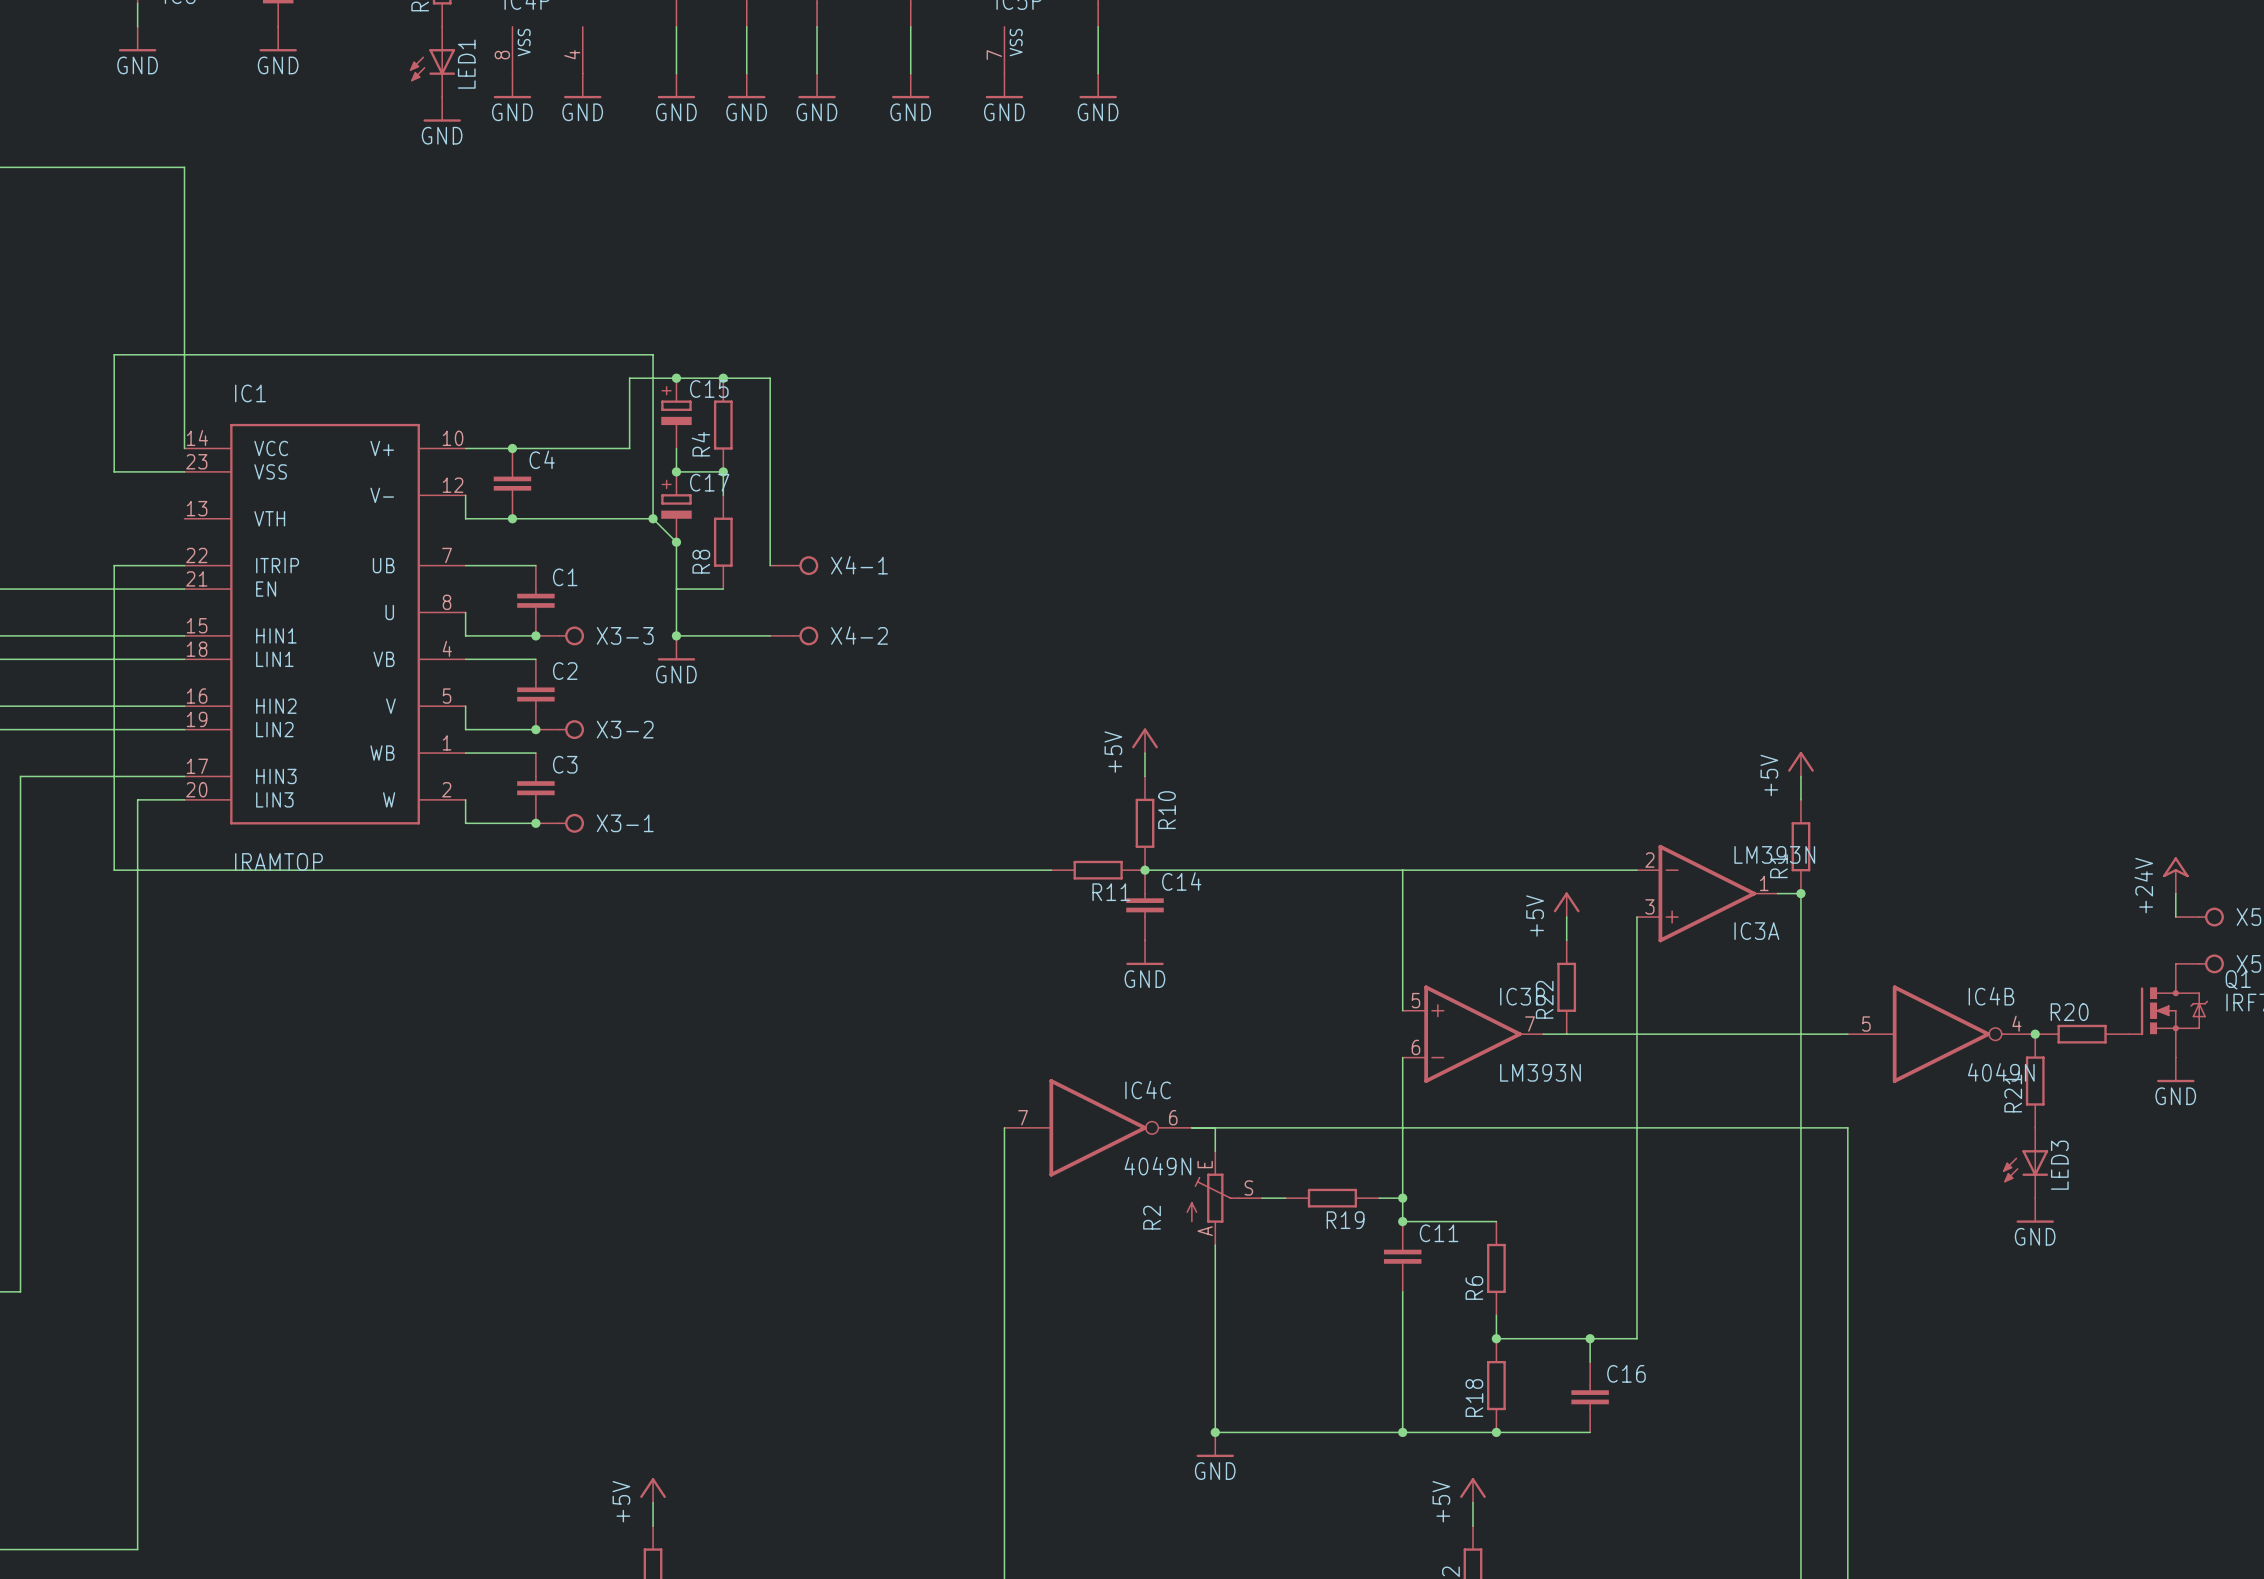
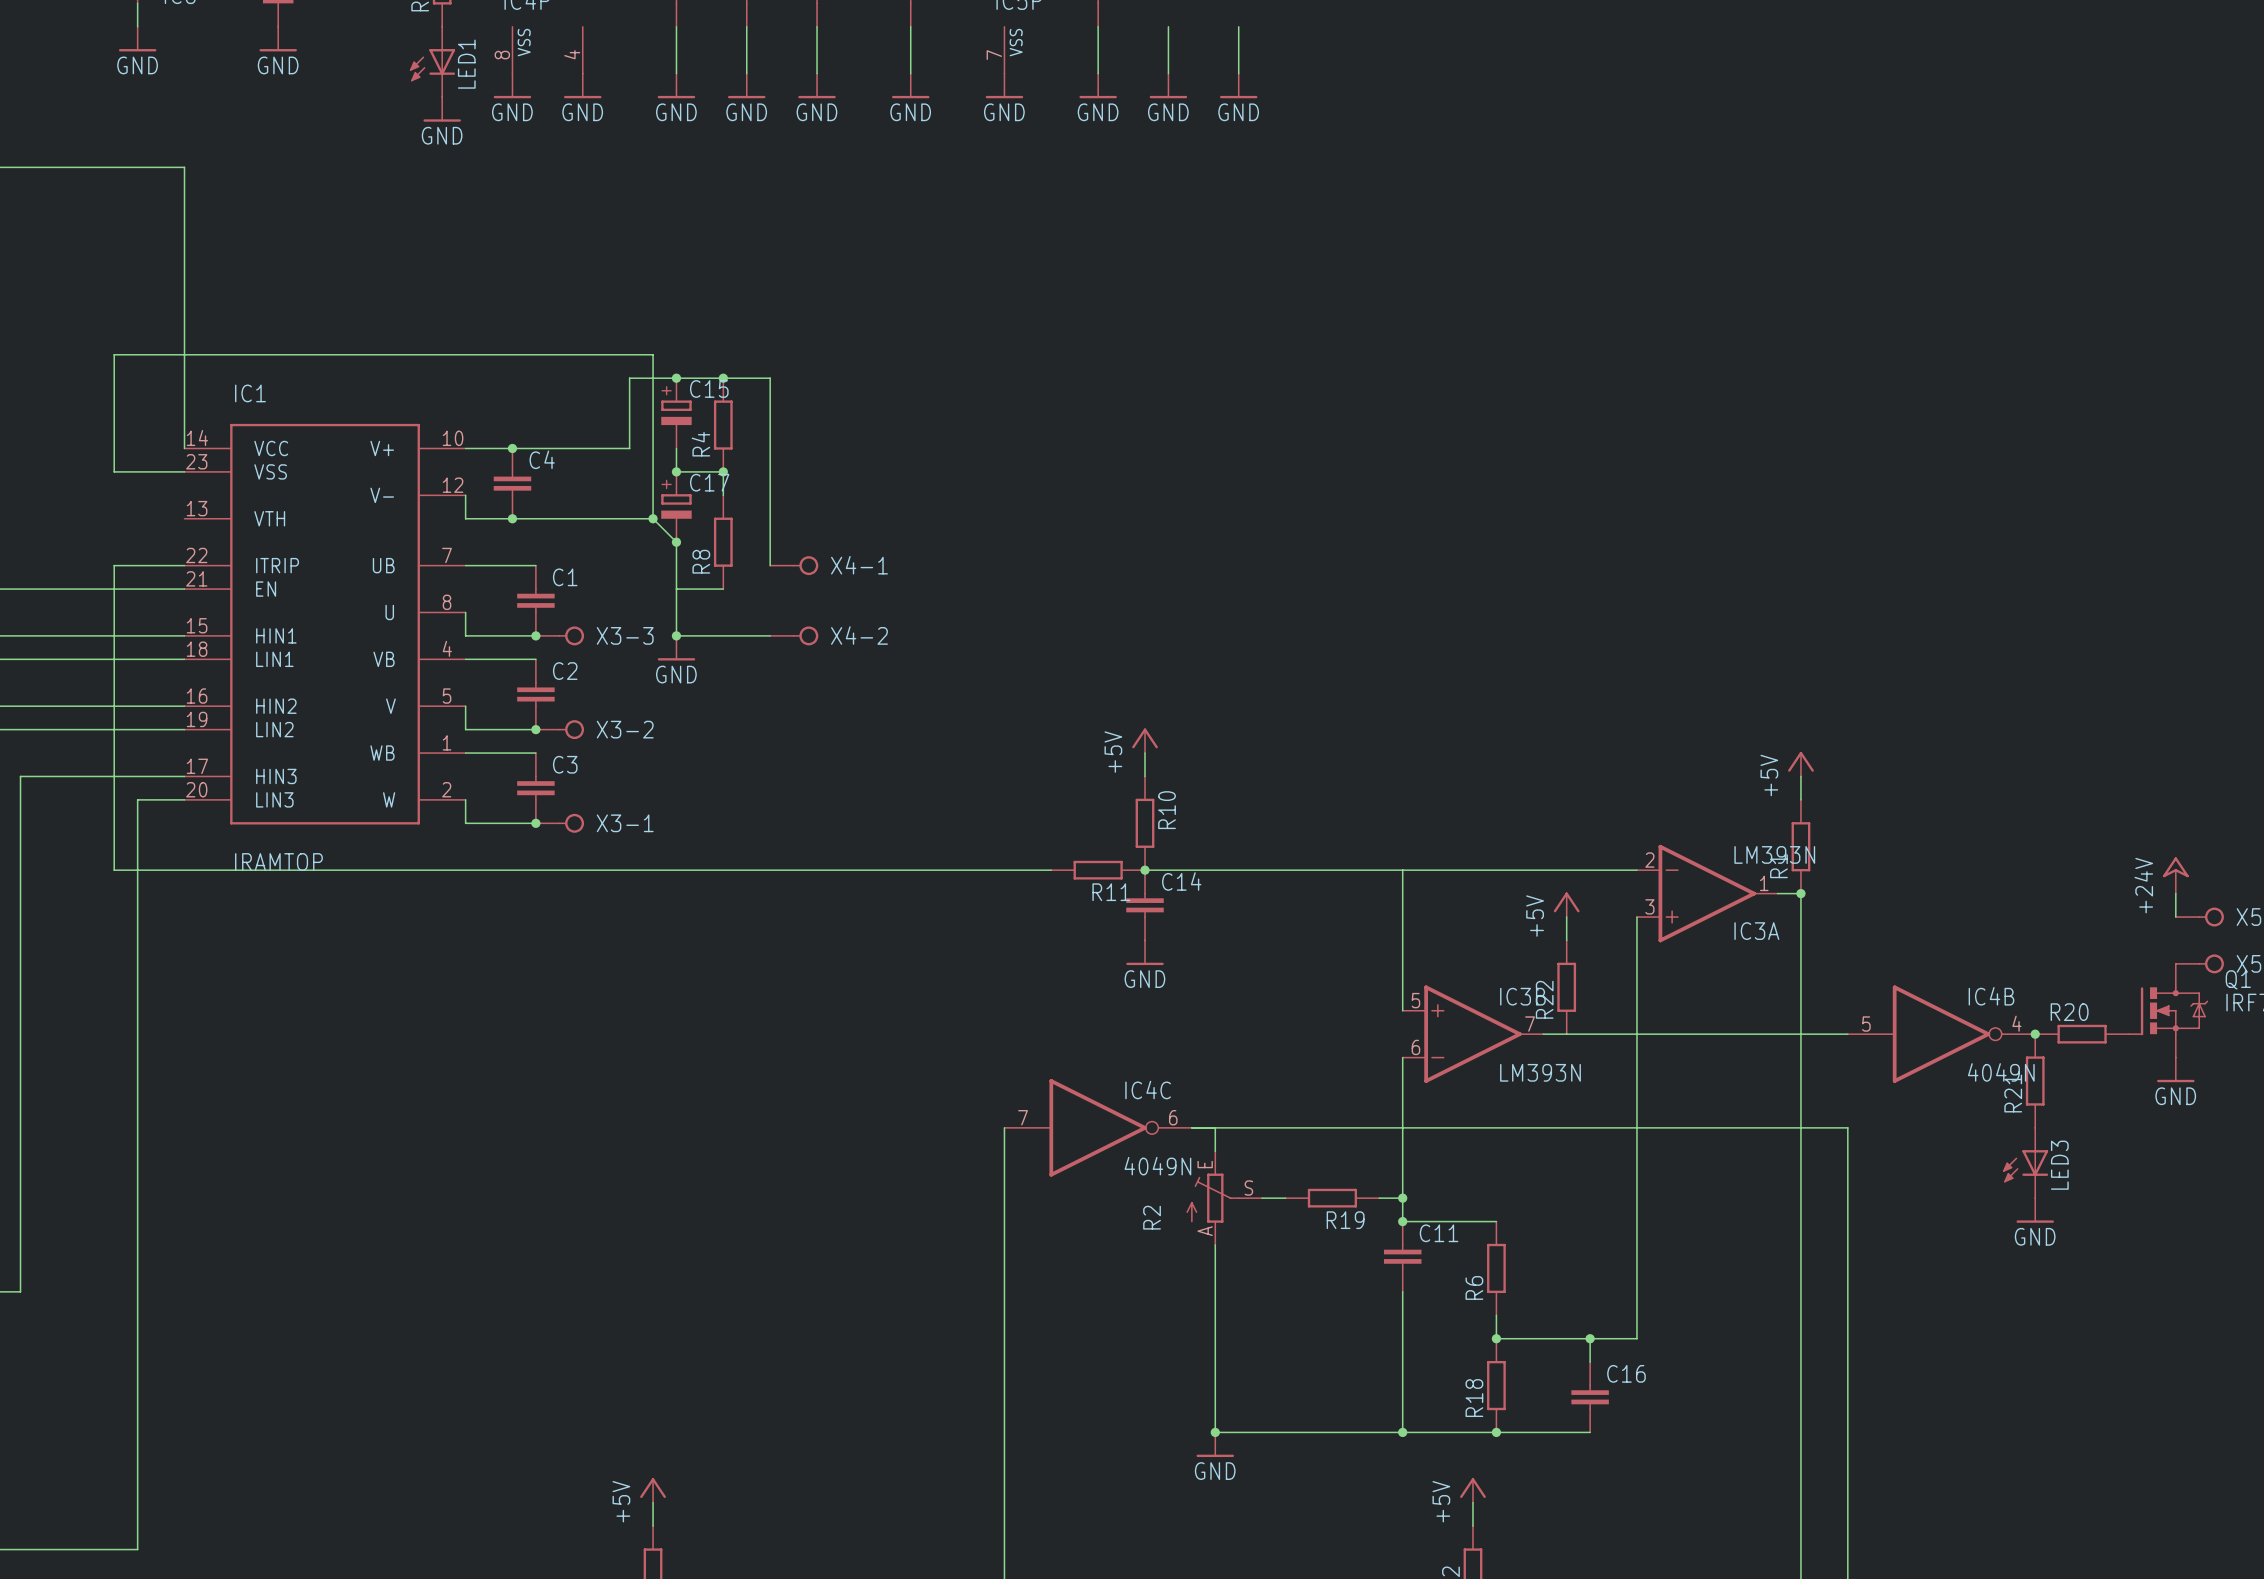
wire: none -> (1168, 26) (1168, 73)
wire: none -> (1238, 26) (1238, 73)
power symbol: none -> GND (1168, 85)
power symbol: none -> GND (1238, 85)

